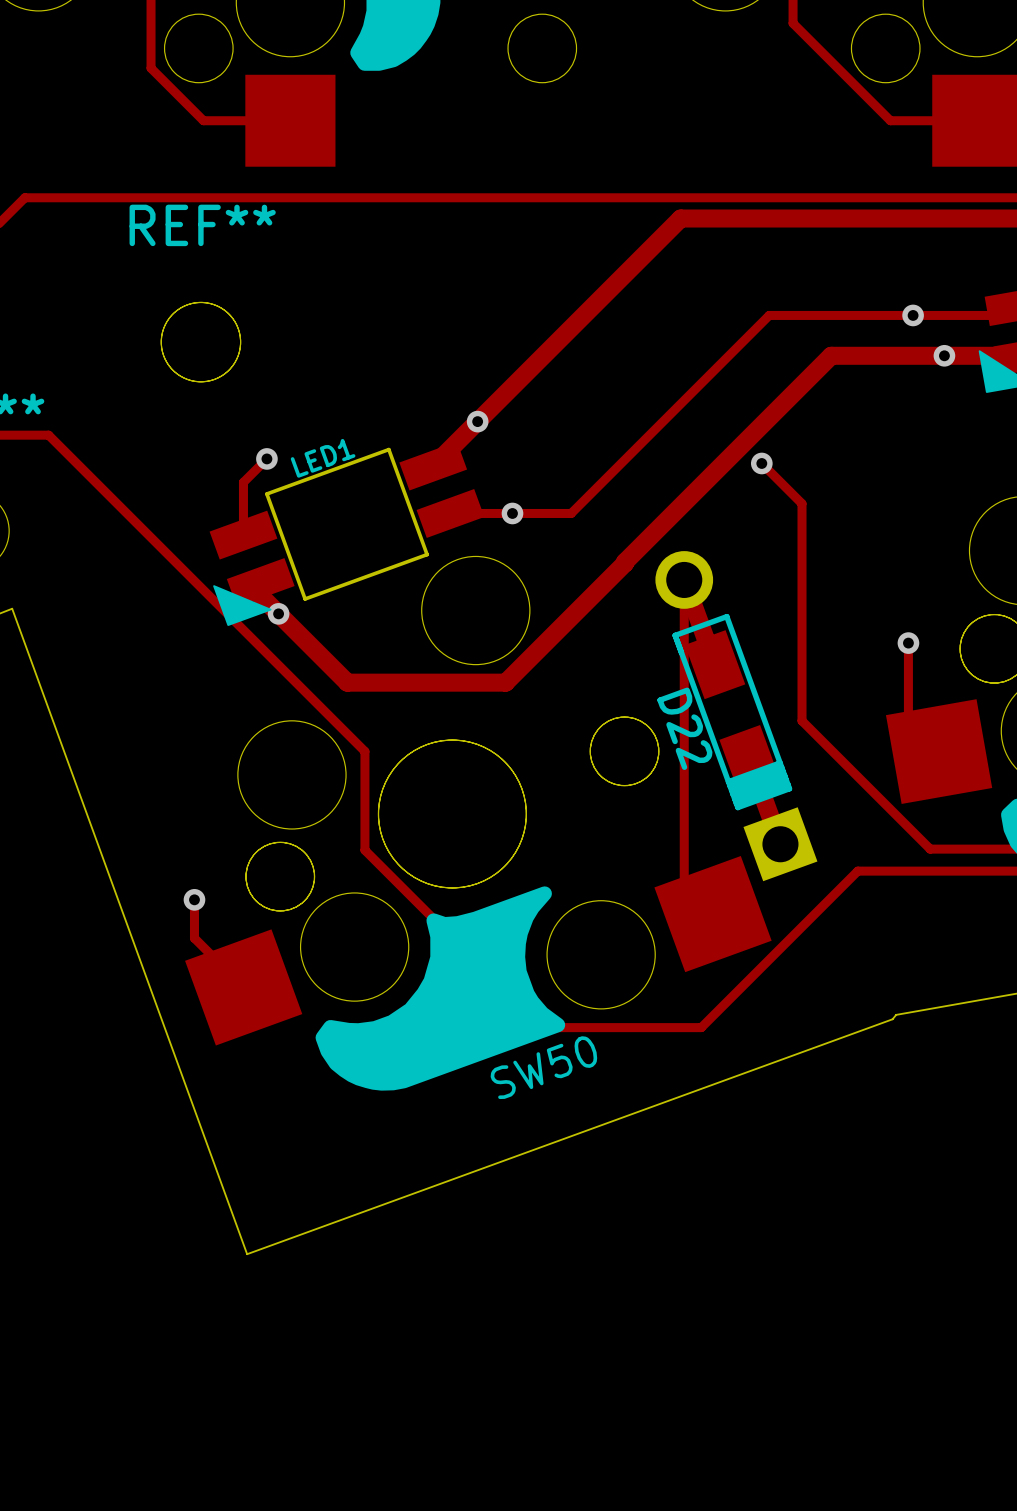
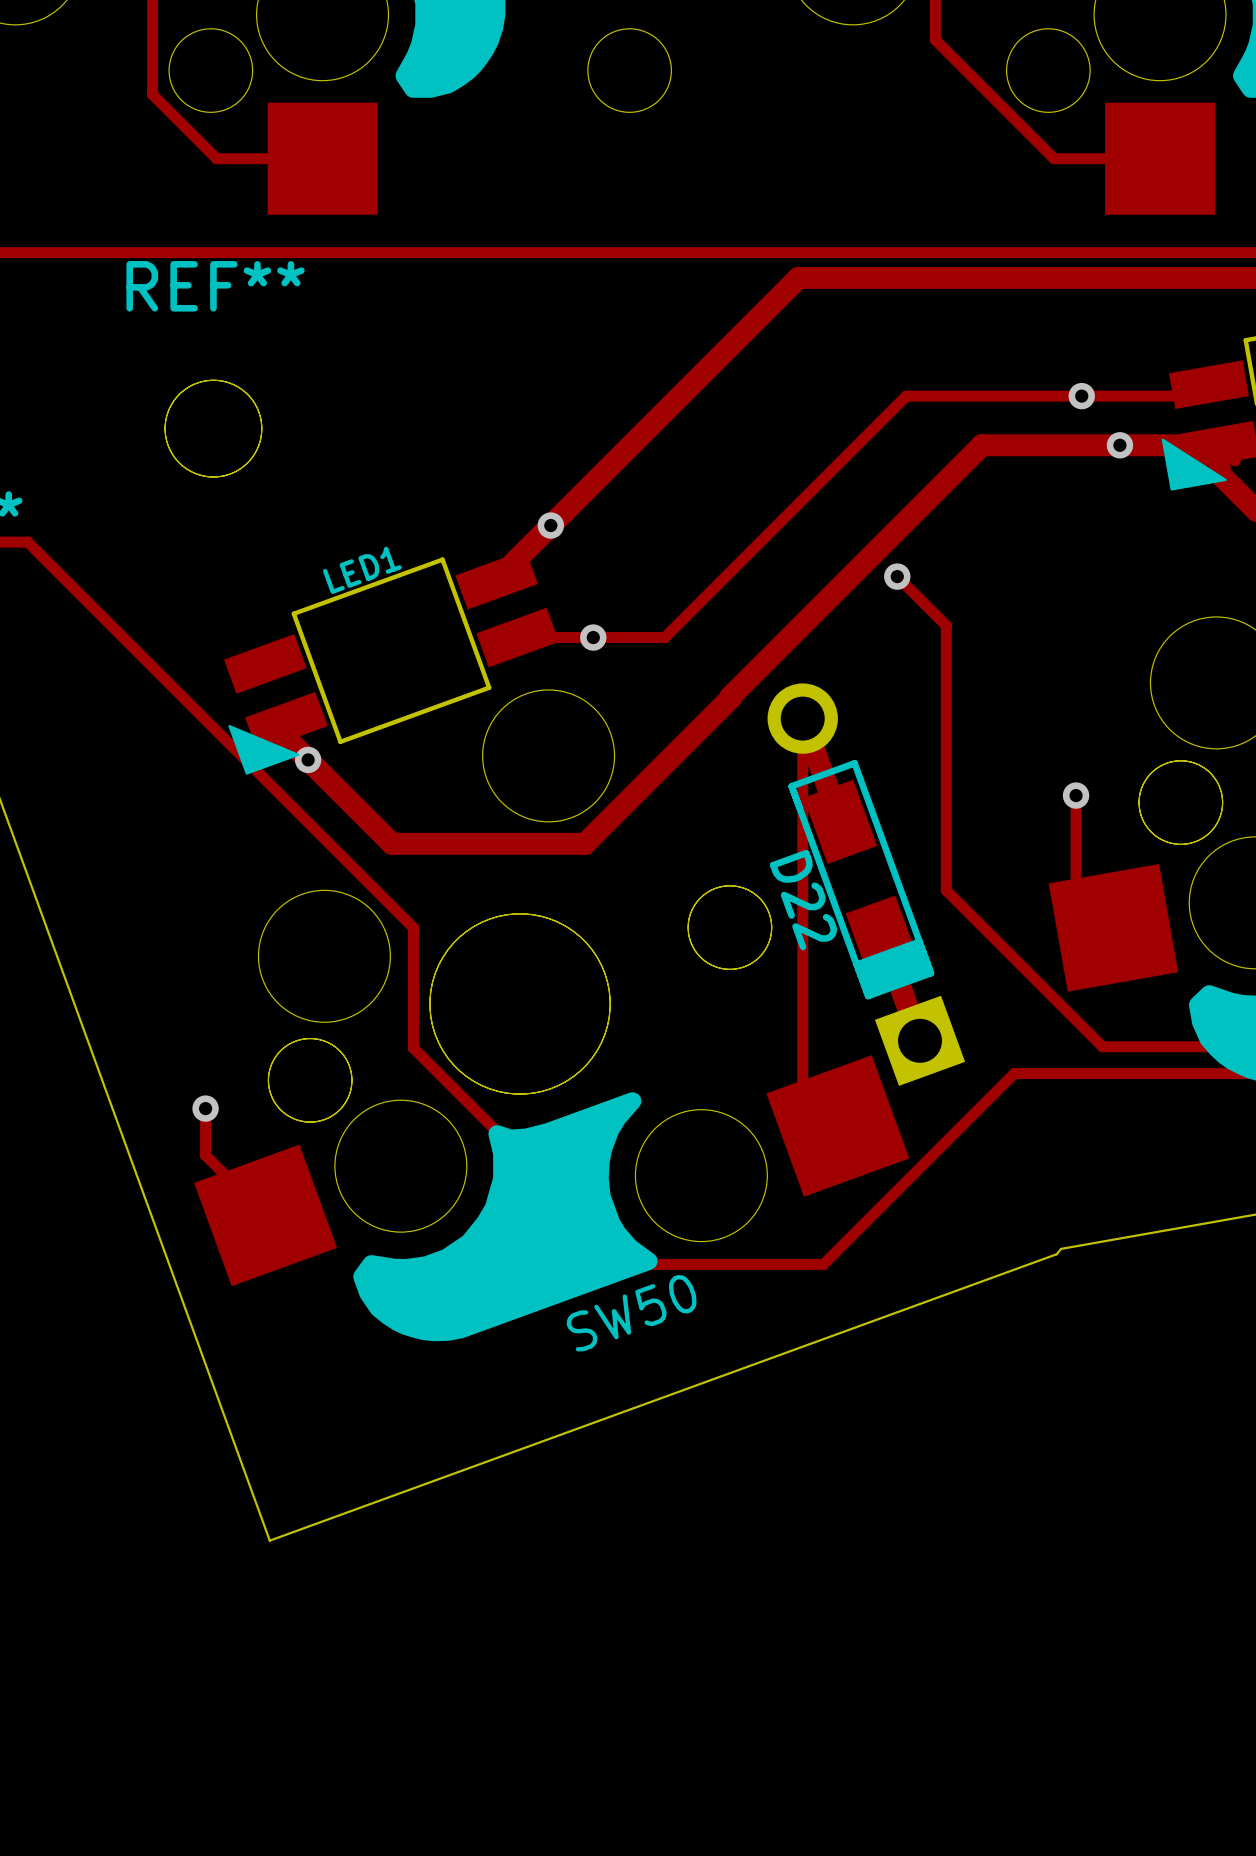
track: (266, 458) (243, 482) (243, 535) -> none
via: (266, 458) -> none

